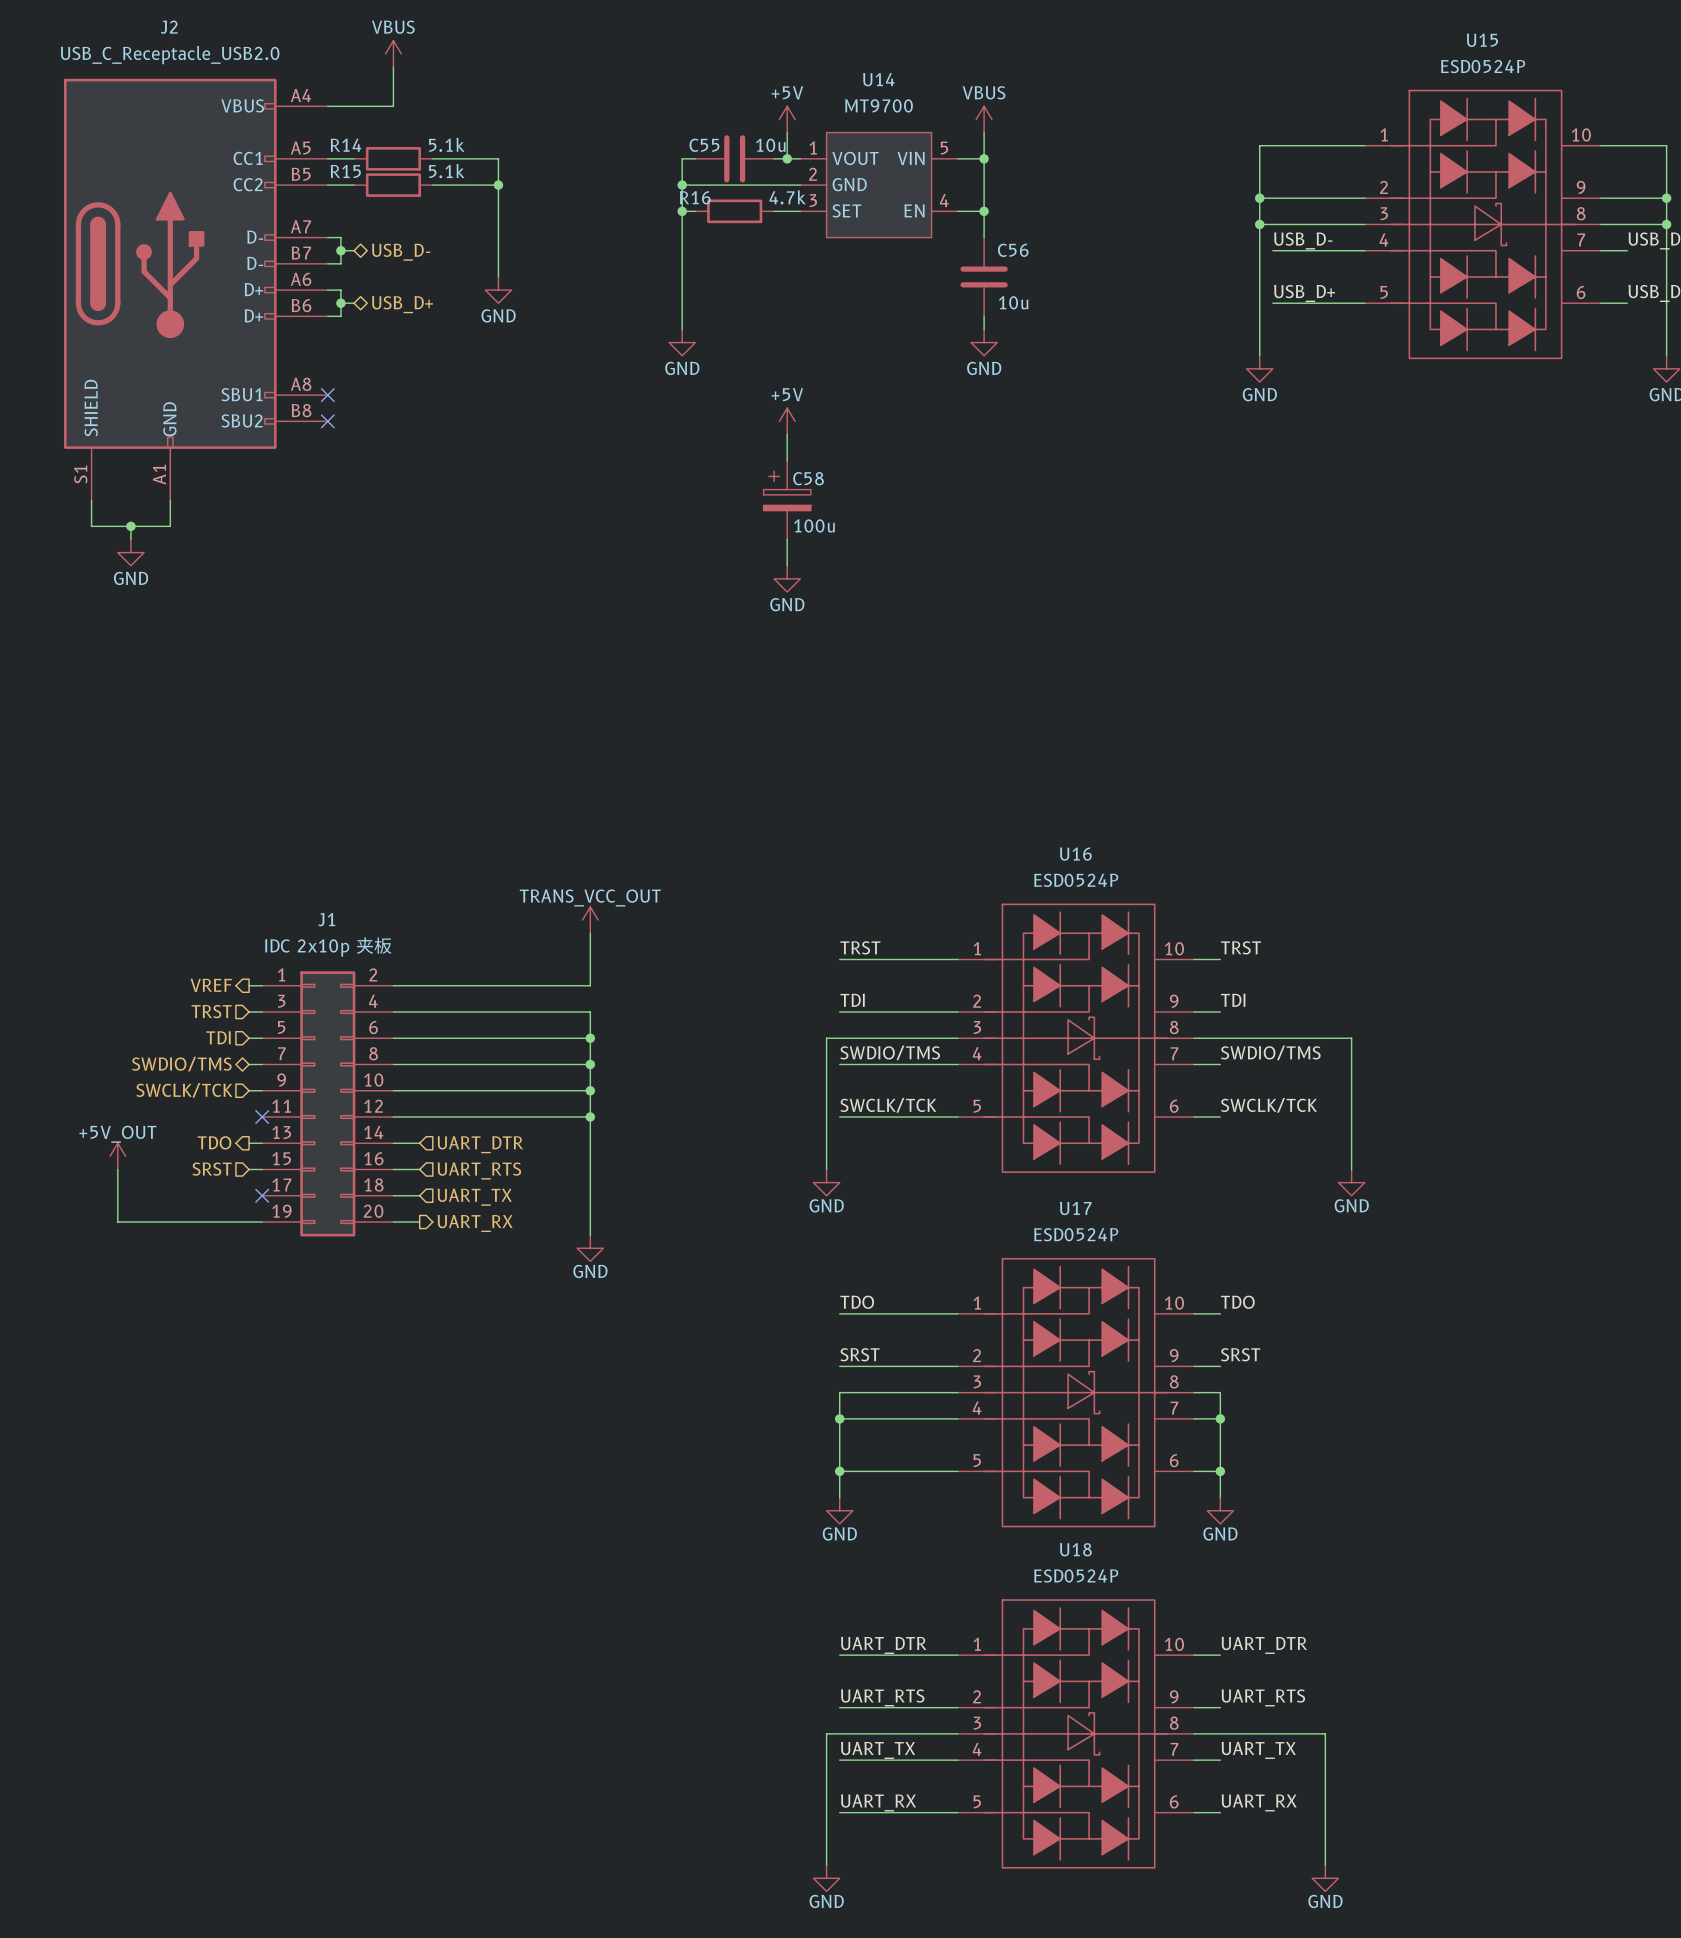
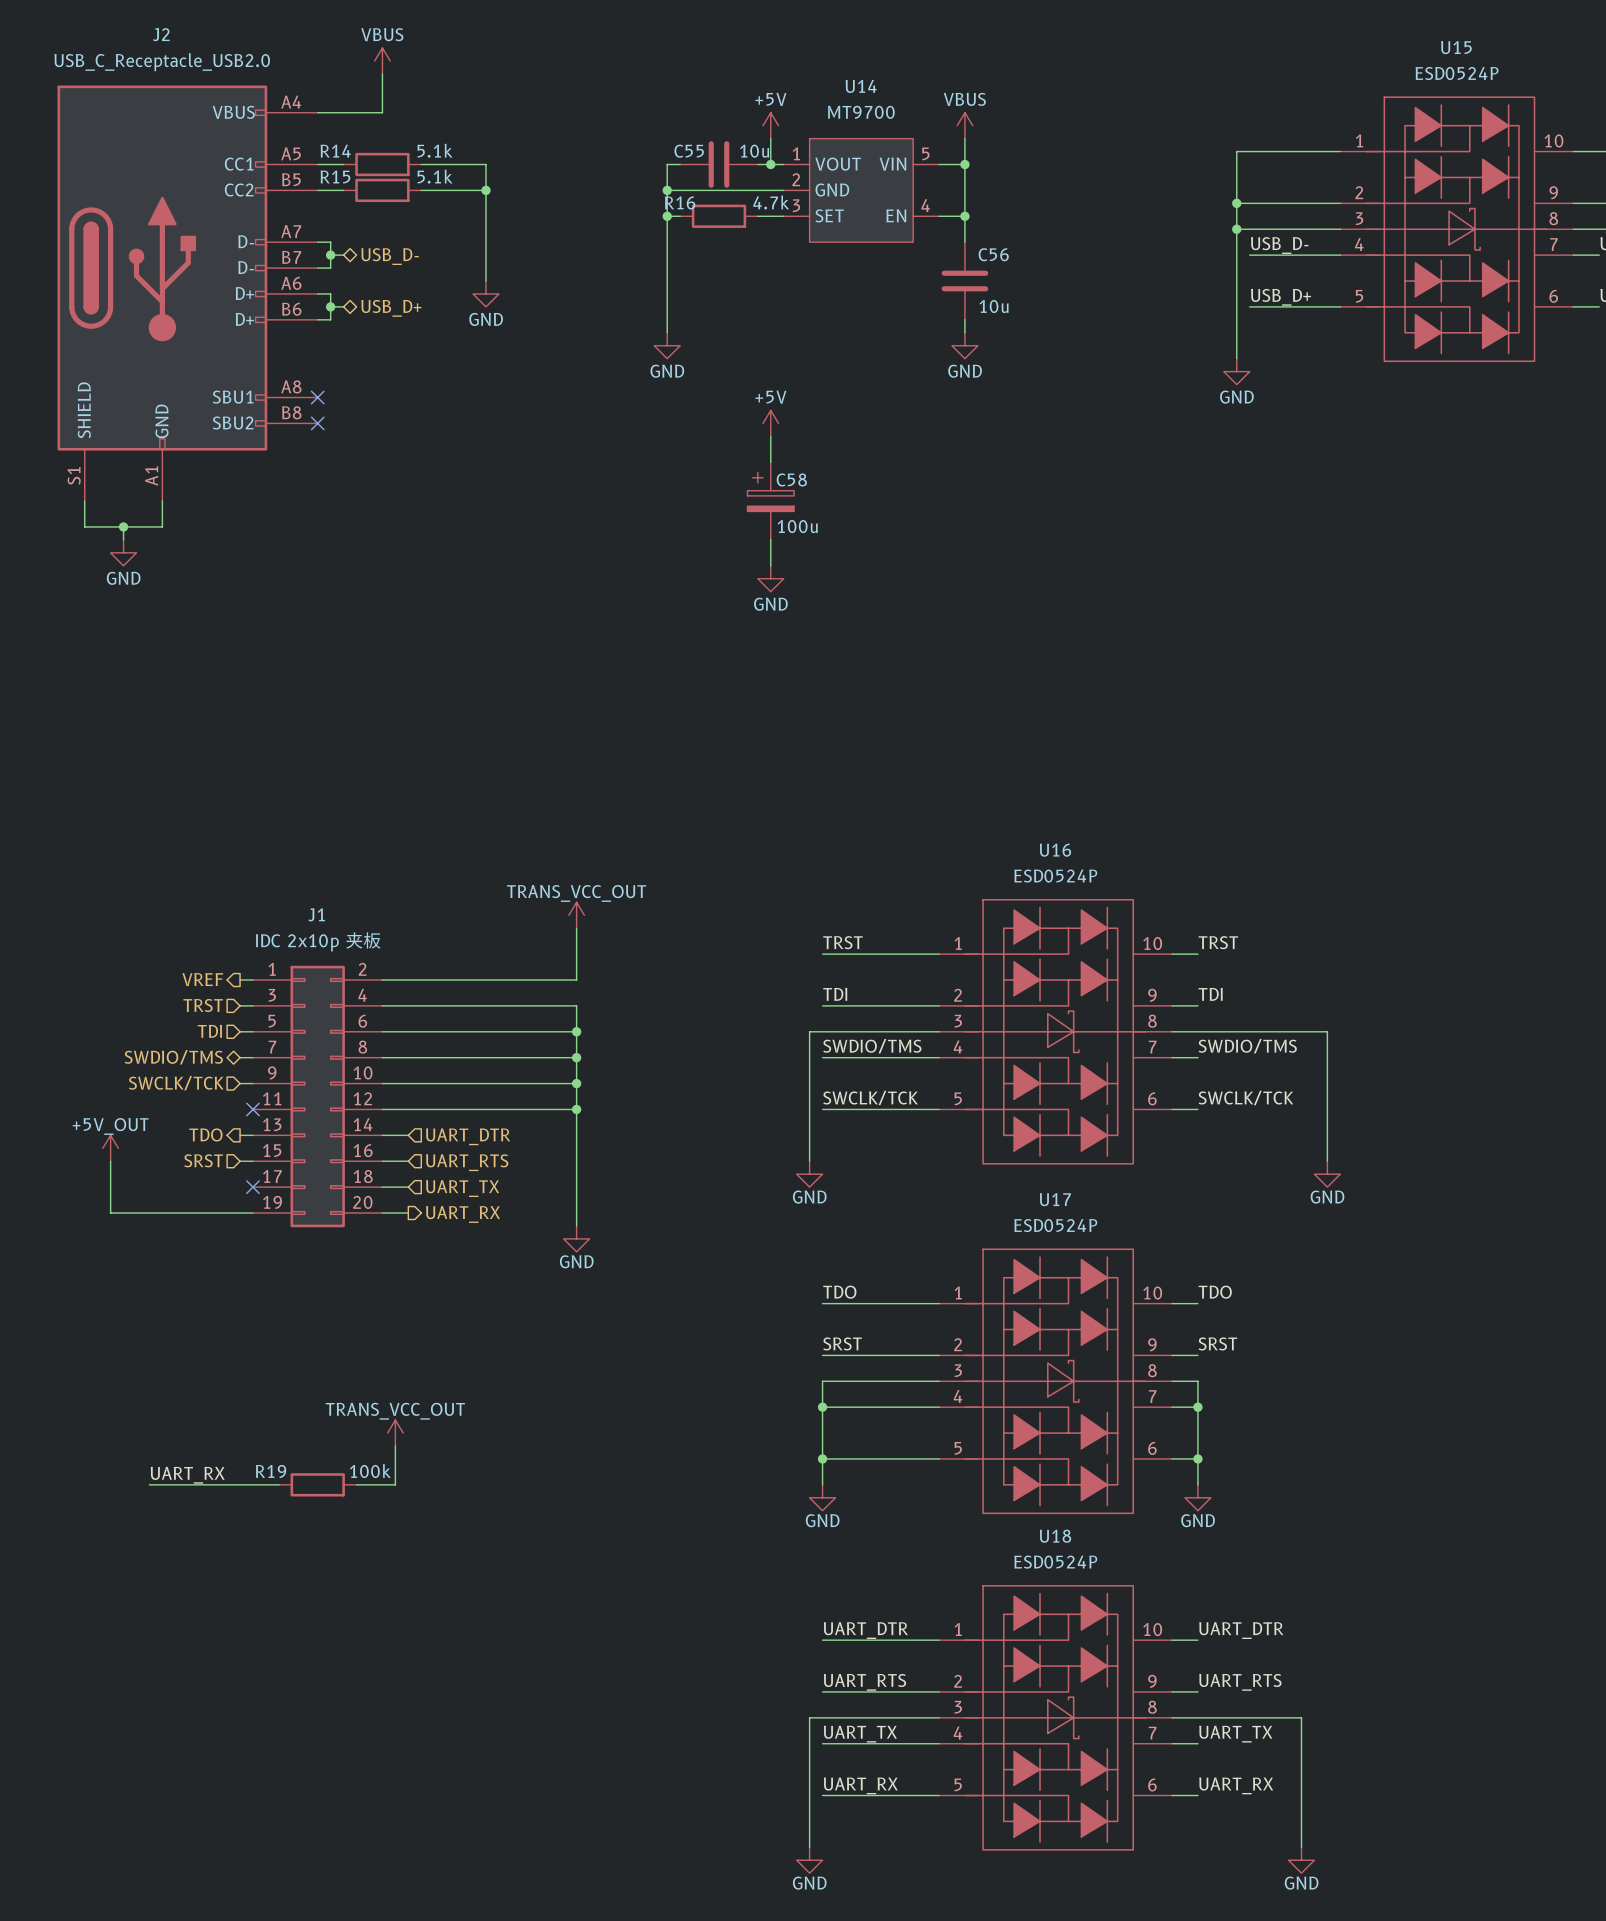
power symbol: none -> TRANS_VCC_OUT (395, 1433)
wire: none -> (395, 1446) (395, 1484) (356, 1484)
label: none -> UART_RX (187, 1475)
wire: none -> (149, 1484) (278, 1484)
R19: none -> 100k (317, 1484)

